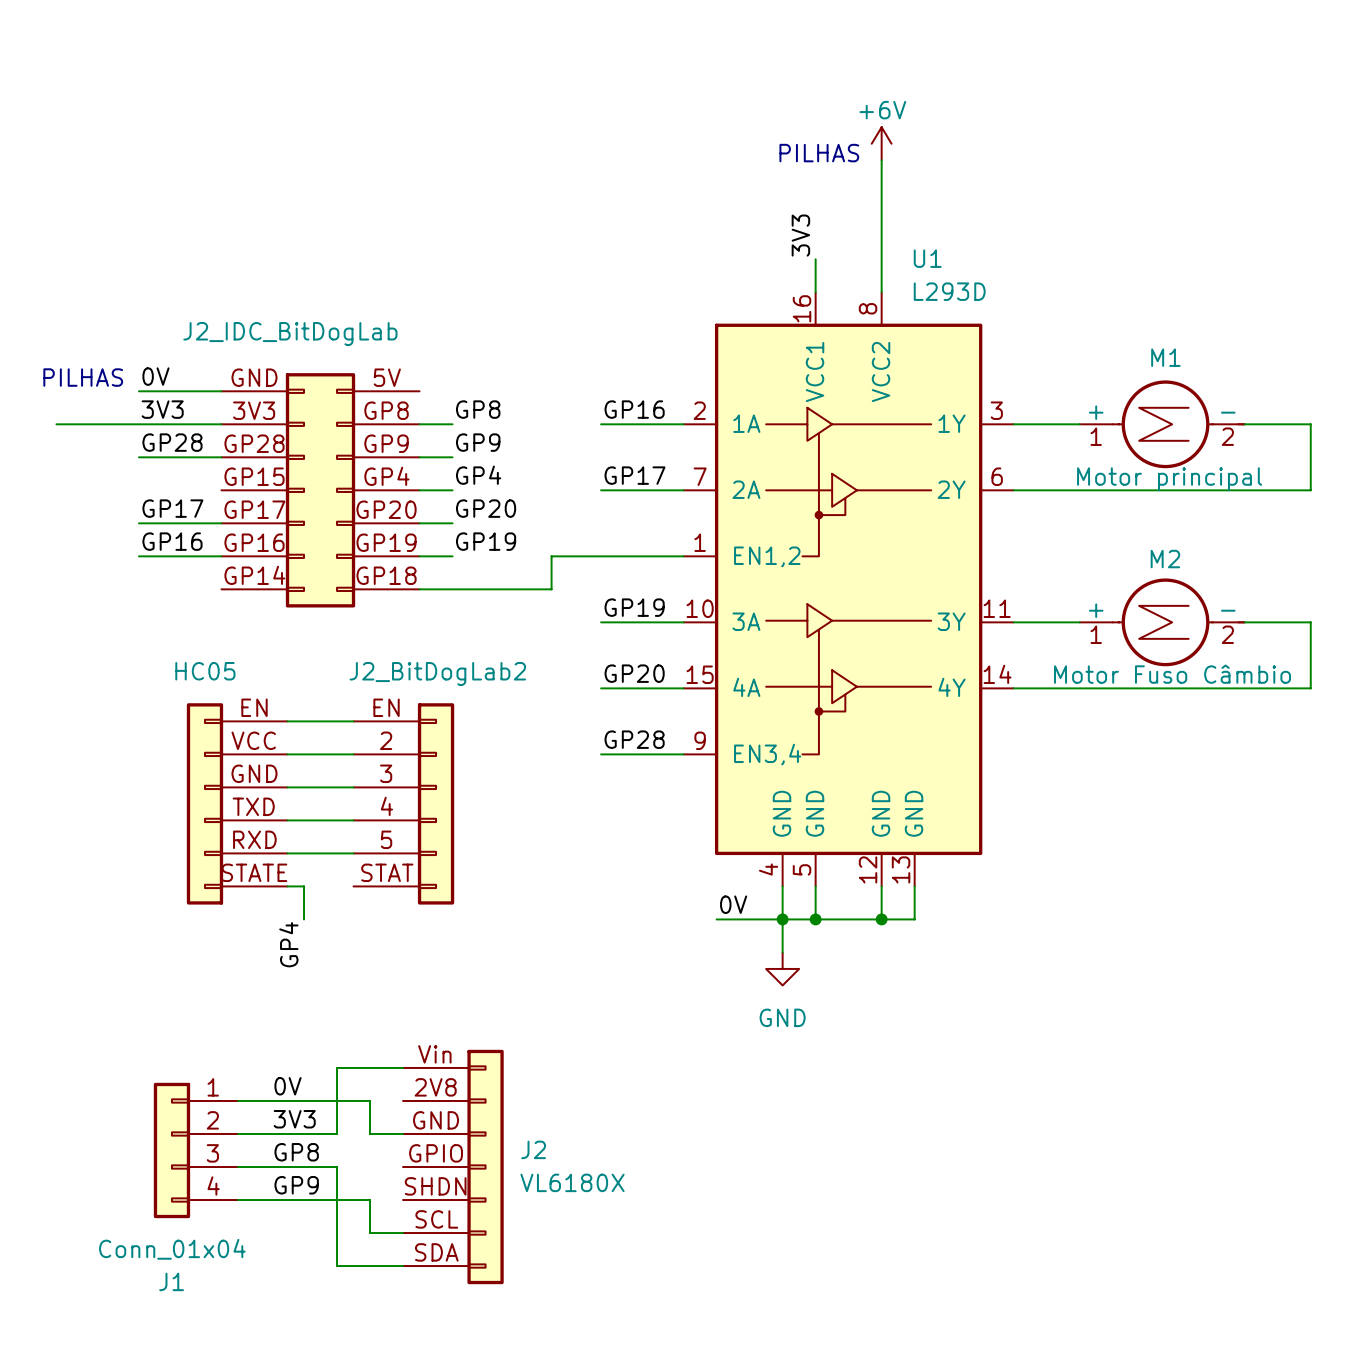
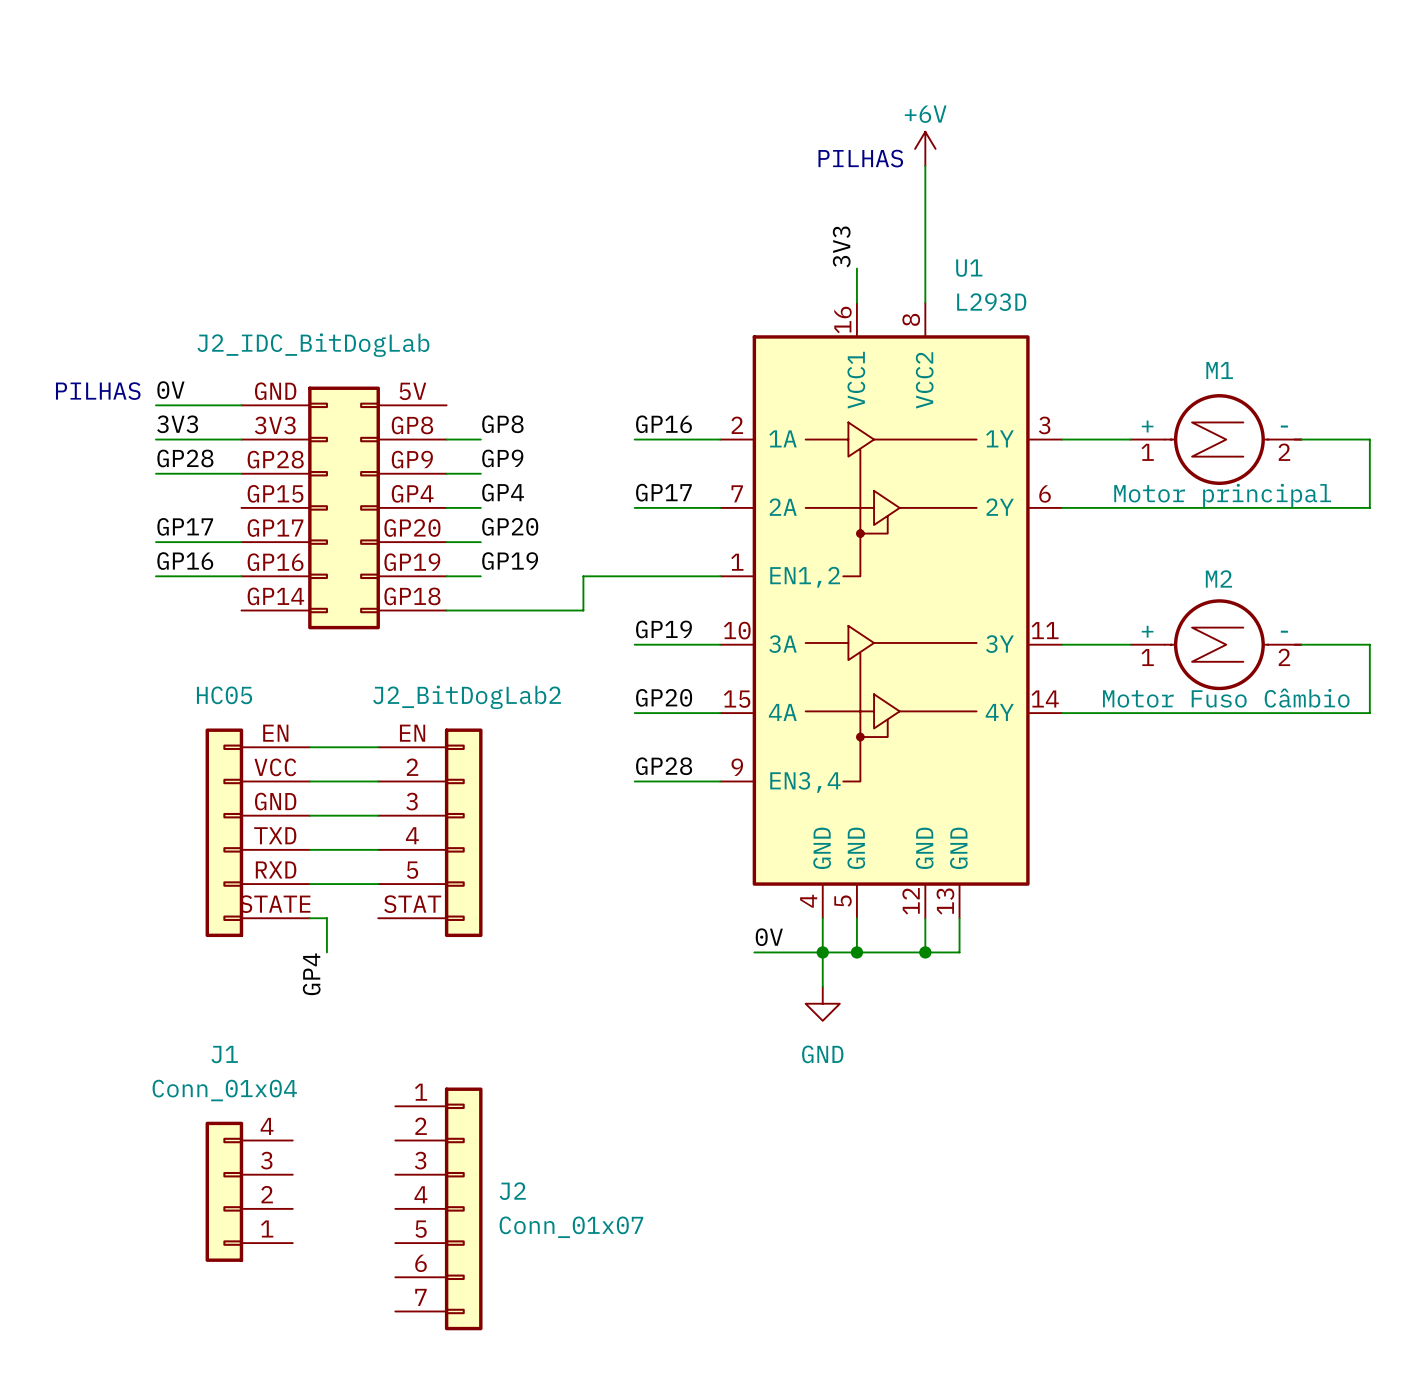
wire: (56, 424) (138, 424) -> none
J2 symbol: [403, 1049, 504, 1285] -> [395, 1087, 483, 1331]
wire: (403, 1067) (337, 1067) (337, 1133) (237, 1133) -> none
label: 0V (288, 1086) -> none
wire: (237, 1100) (370, 1100) (370, 1133) (403, 1133) -> none
label: 3V3 (294, 1119) -> none
J1 flip: as is (171, 1150) -> up-down (224, 1191)
label: GP8 (296, 1152) -> none
wire: (237, 1167) (337, 1167) (337, 1266) (403, 1266) -> none
J2 value: VL6180X (572, 1182) -> Conn_01x07 (571, 1227)
label: GP9 (296, 1185) -> none
wire: (237, 1200) (370, 1200) (370, 1233) (403, 1233) -> none

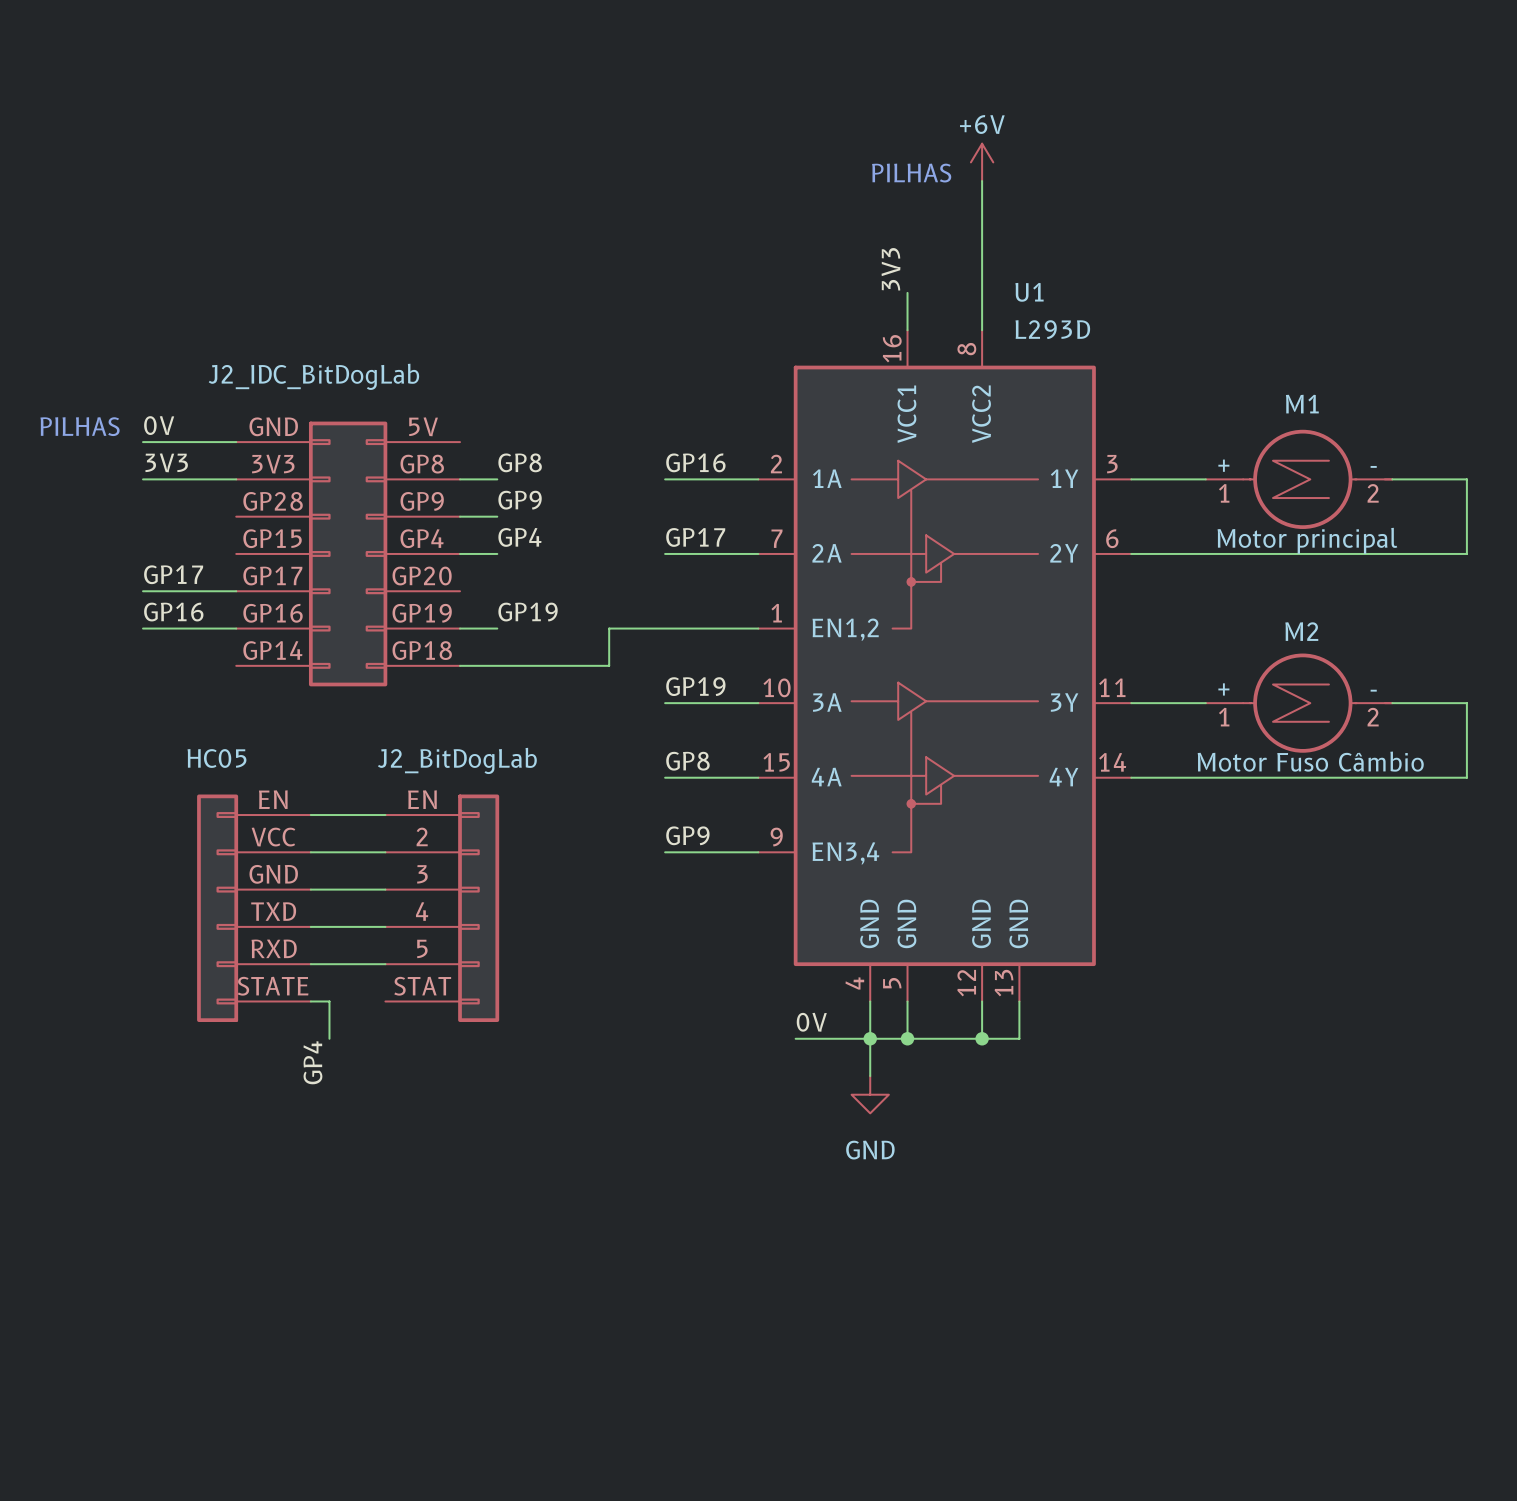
label: GP28 (185, 458) -> none
wire: (155, 473) (241, 473) -> none
label: GP20 (510, 526) -> none
wire: (446, 542) (480, 542) -> none
J2_BitDogLab2 name: J2_BitDogLab2 (467, 697) -> J2_BitDogLab (457, 760)
label: GP20 (664, 697) -> GP8 (687, 761)
label: GP28 (664, 766) -> GP9 (687, 835)
J1: Conn_01x04 (249, 1191) -> none
J2: Conn_01x07 (438, 1208) -> none

